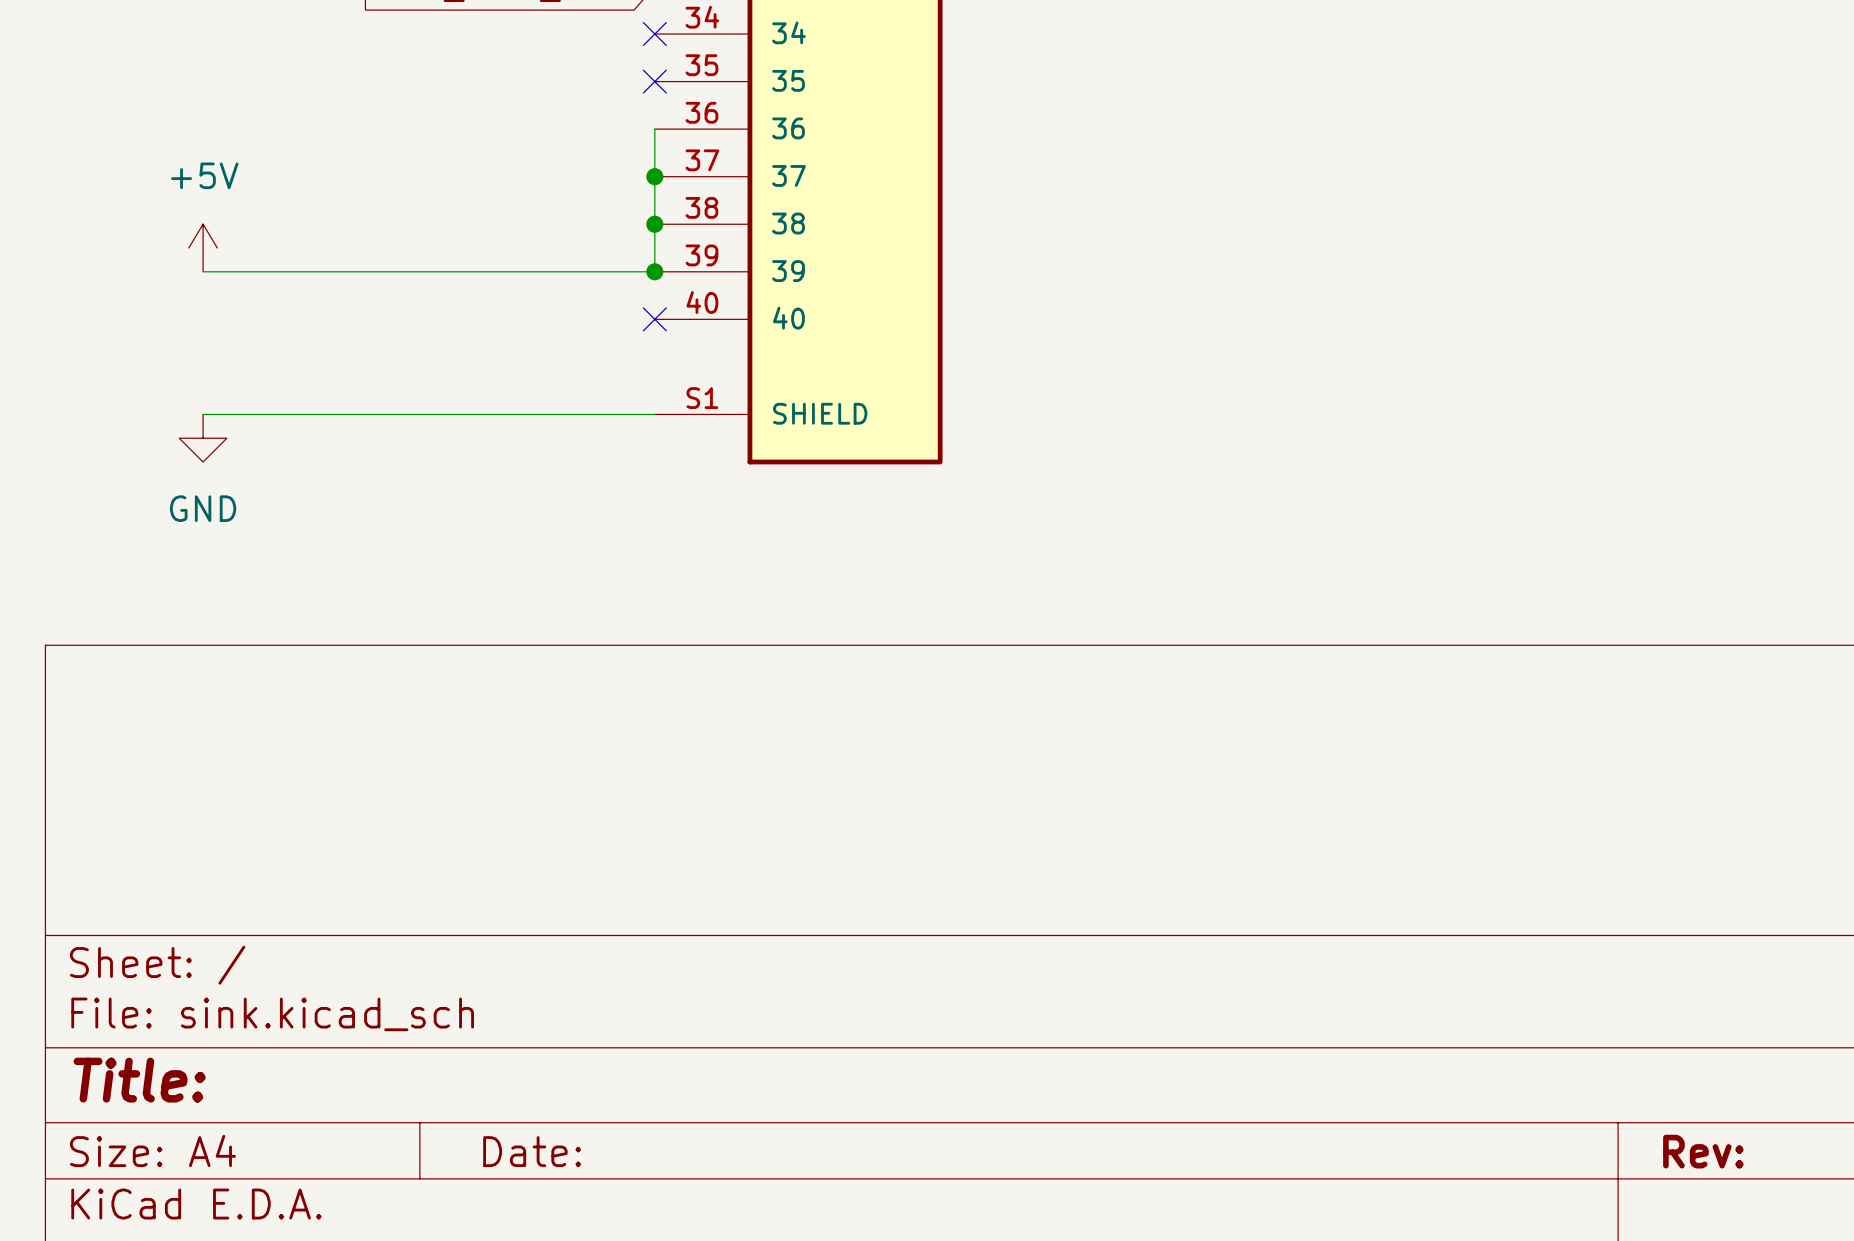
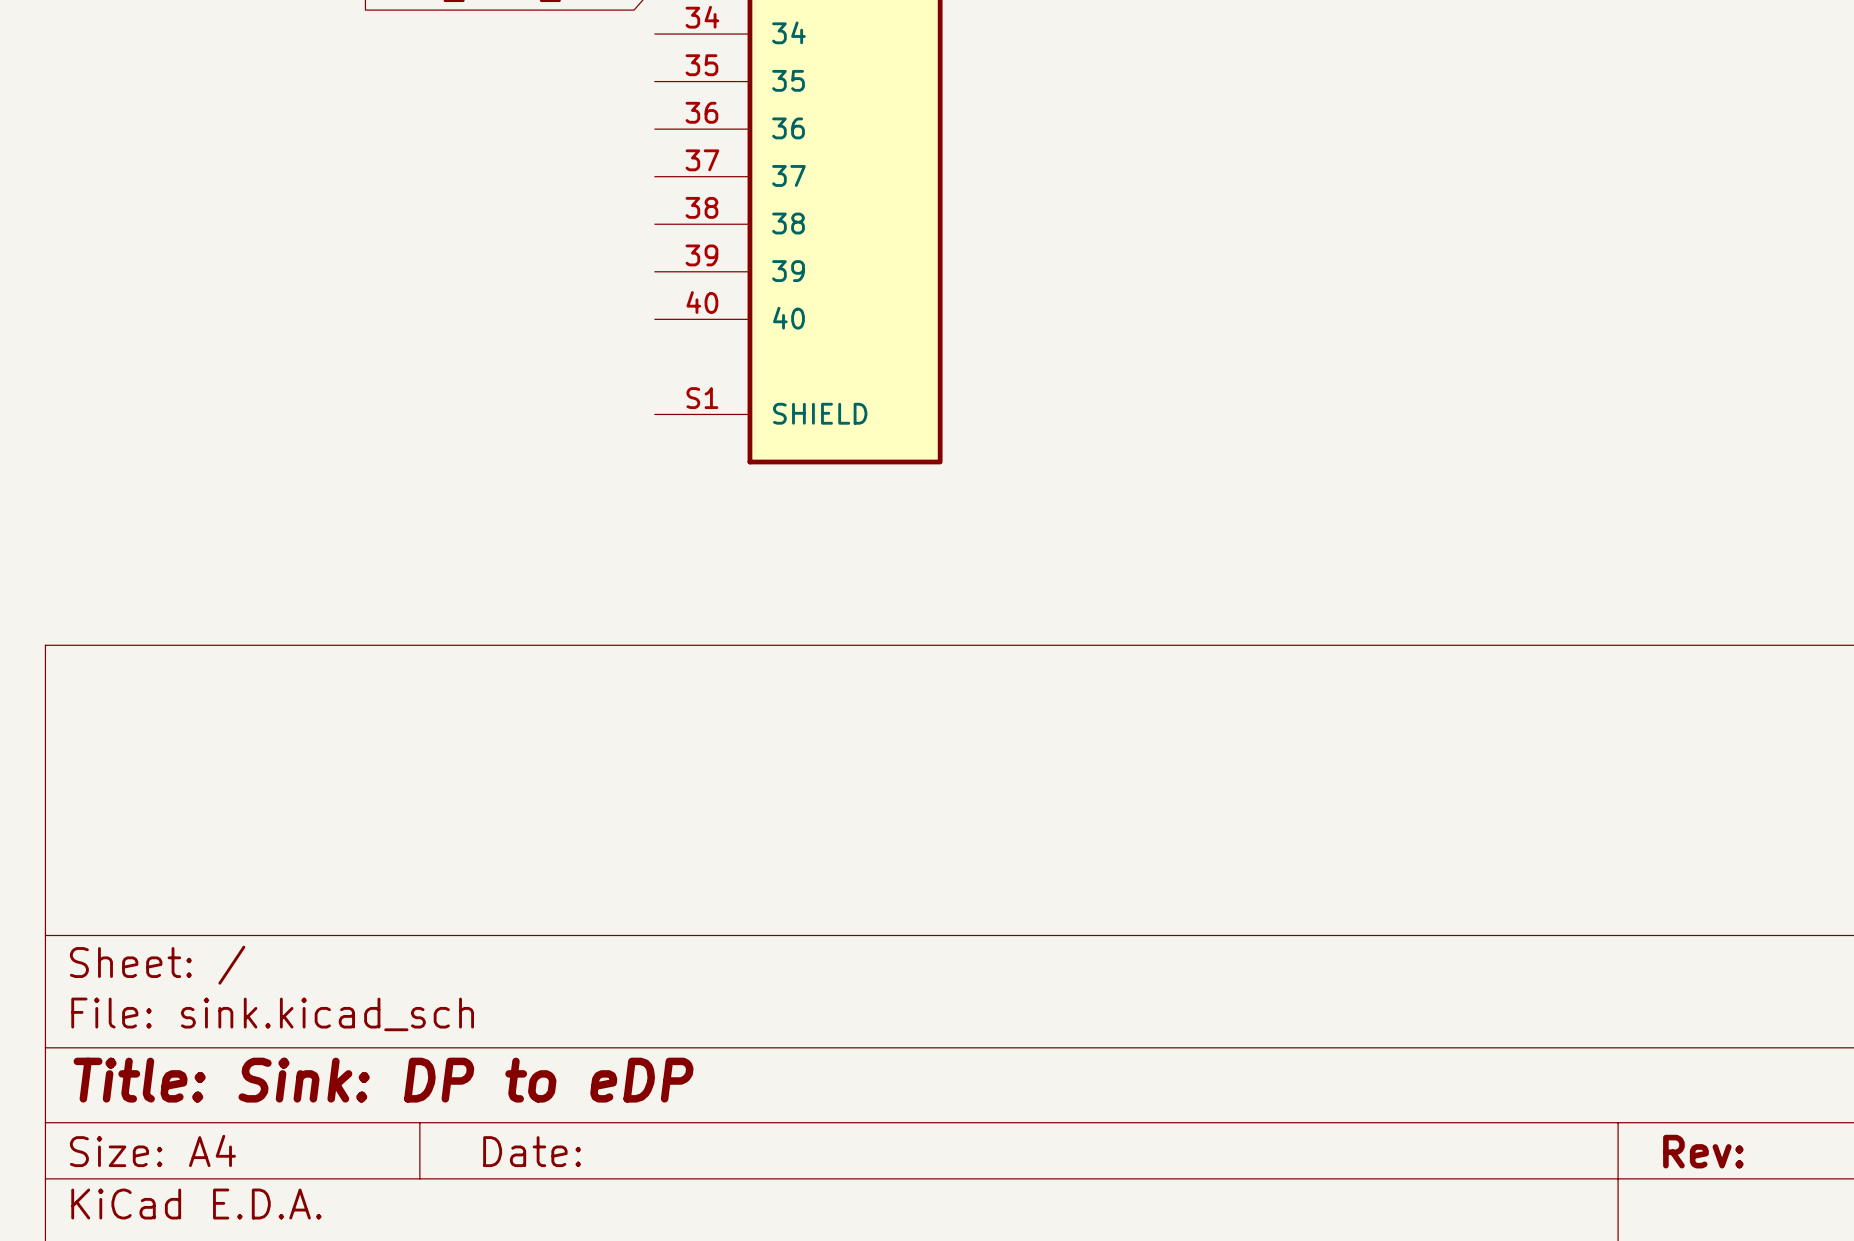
no-connect mark: (654, 34) -> none
no-connect mark: (654, 81) -> none
wire: (654, 129) (654, 271) (203, 271) -> none
junction: (654, 176) -> none
junction: (654, 224) -> none
power symbol: +5V (203, 248) -> none
junction: (654, 271) -> none
no-connect mark: (654, 319) -> none
wire: (203, 414) (654, 414) -> none
power symbol: GND (203, 438) -> none
title block: Title: (139, 1080) -> Title: Sink: DP to eDP (383, 1080)

